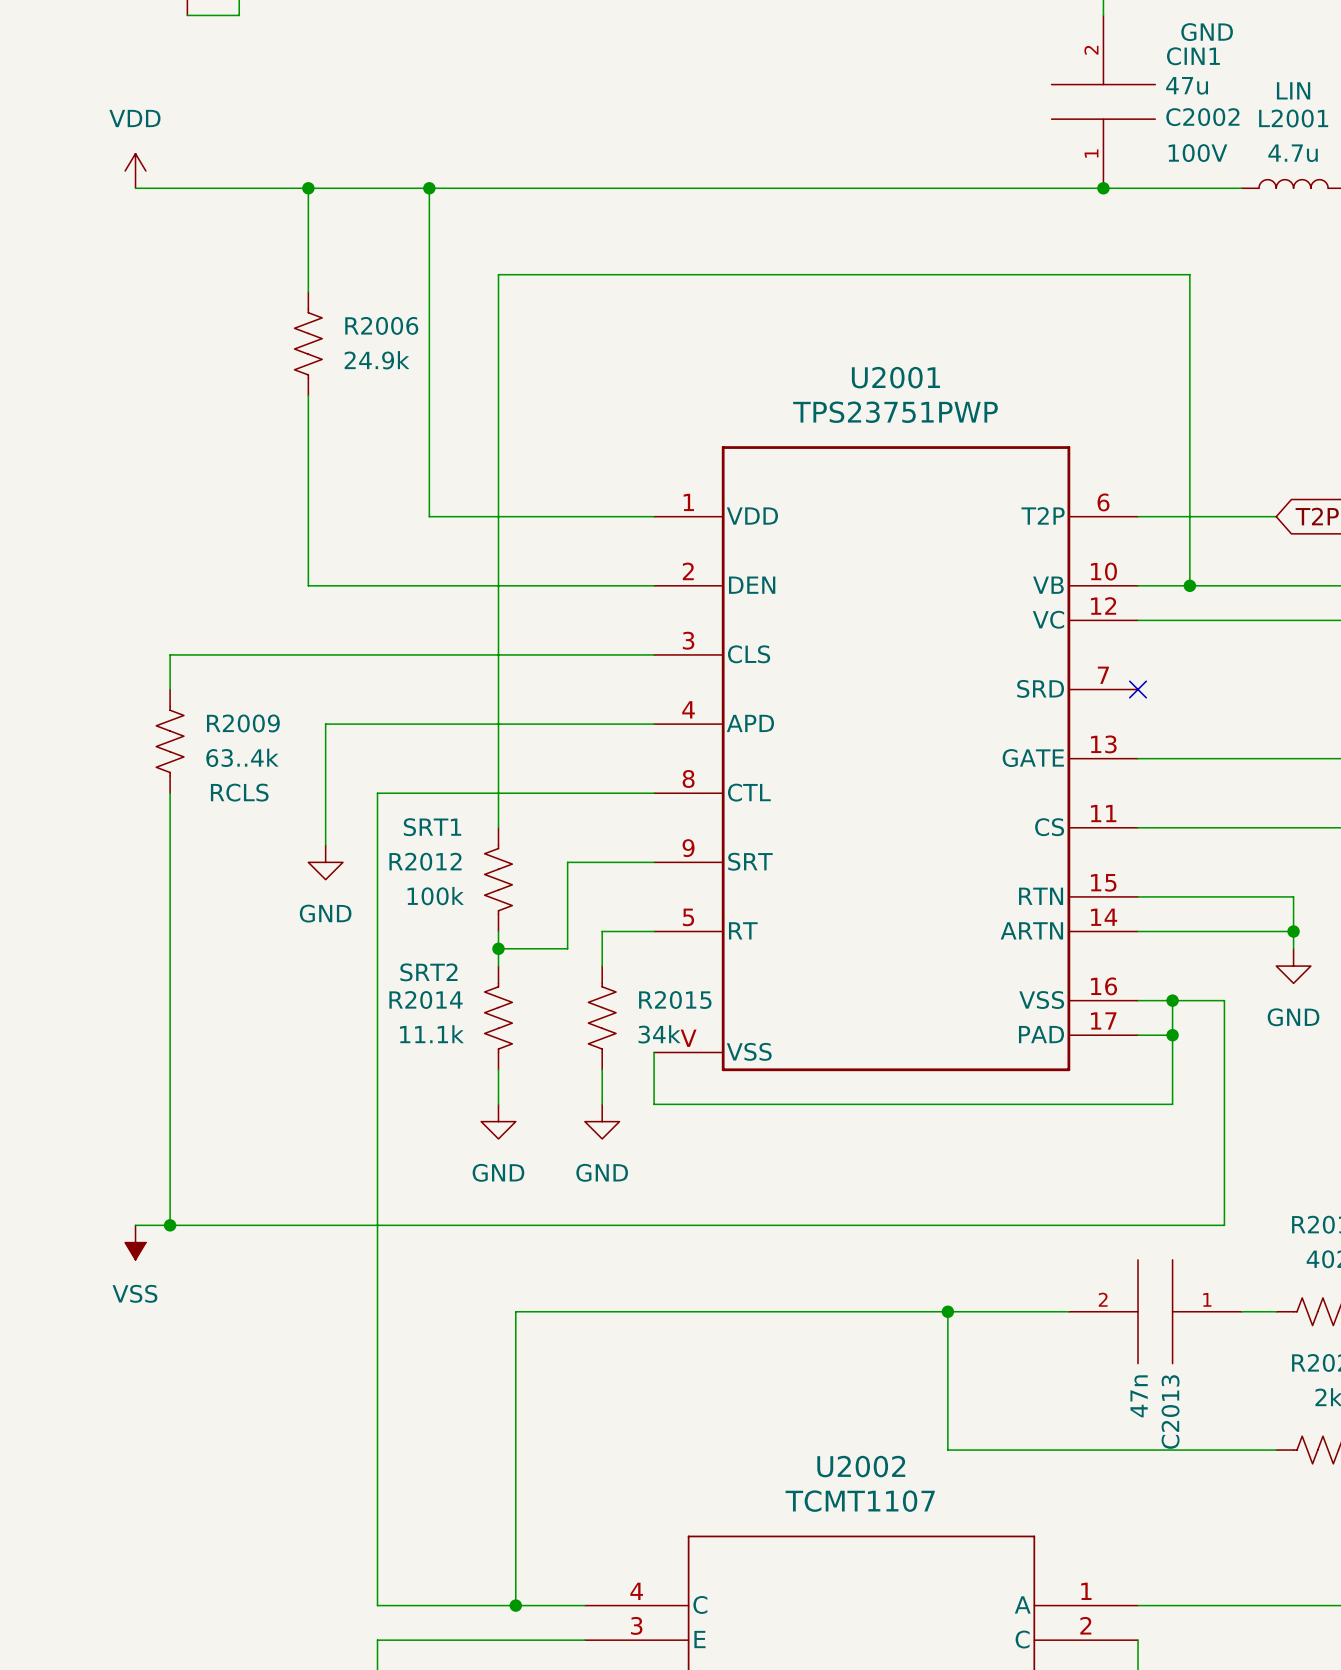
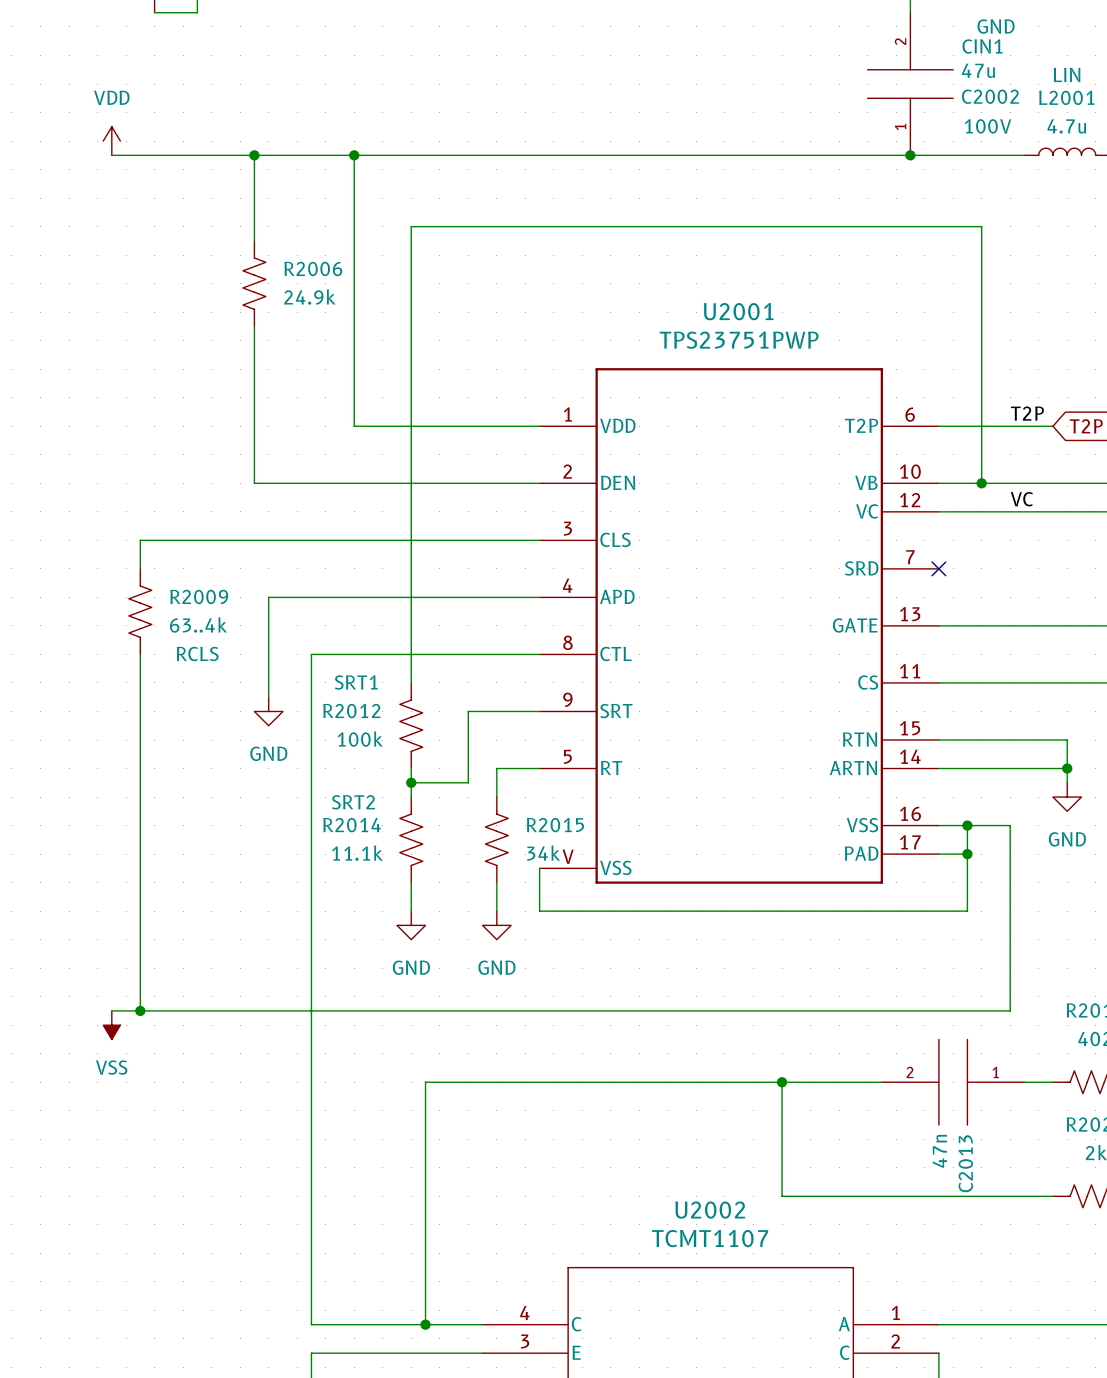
label: none -> T2P (1027, 413)
label: none -> VC (1021, 499)

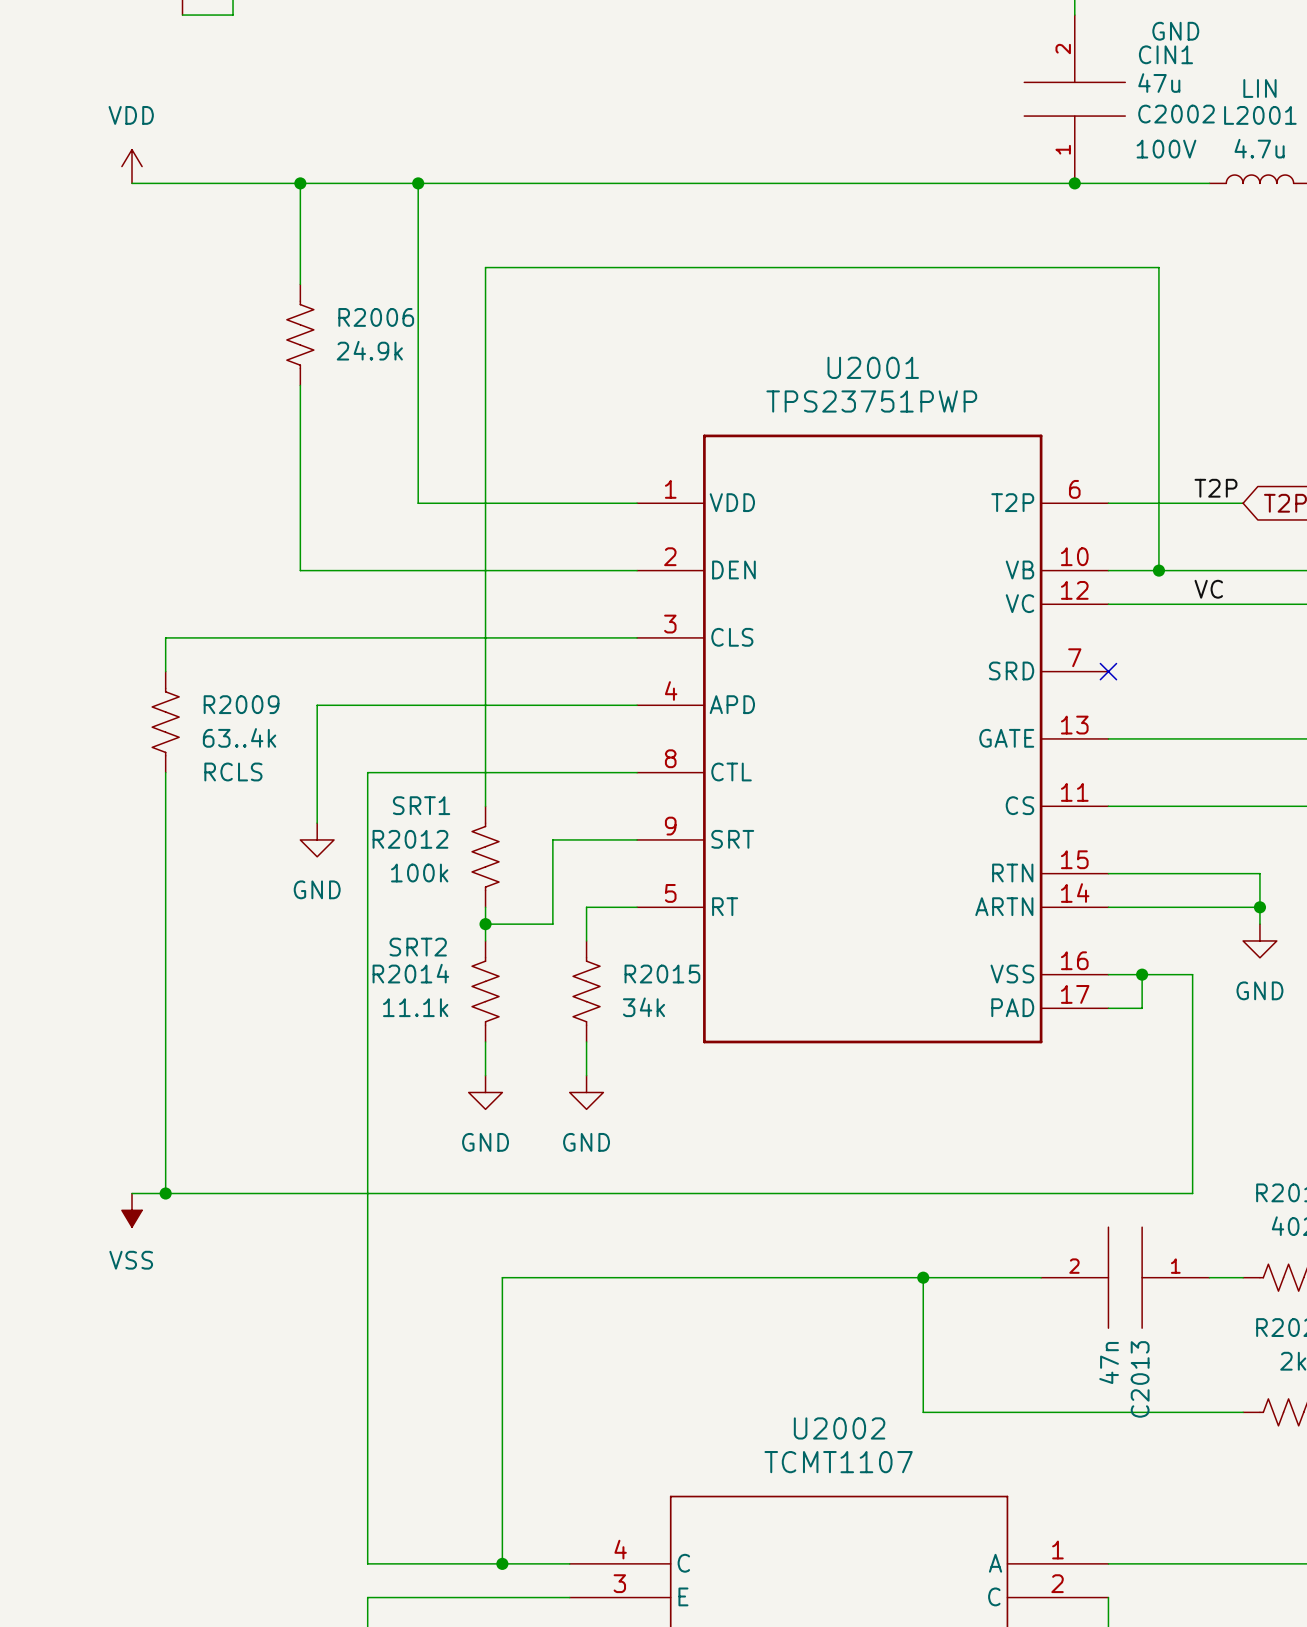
U2001 symbol: [539, 368, 939, 884] -> [637, 434, 1109, 1044]
wire: (967, 854) (967, 911) (539, 911) (539, 868) -> none
junction: (967, 854) -> none

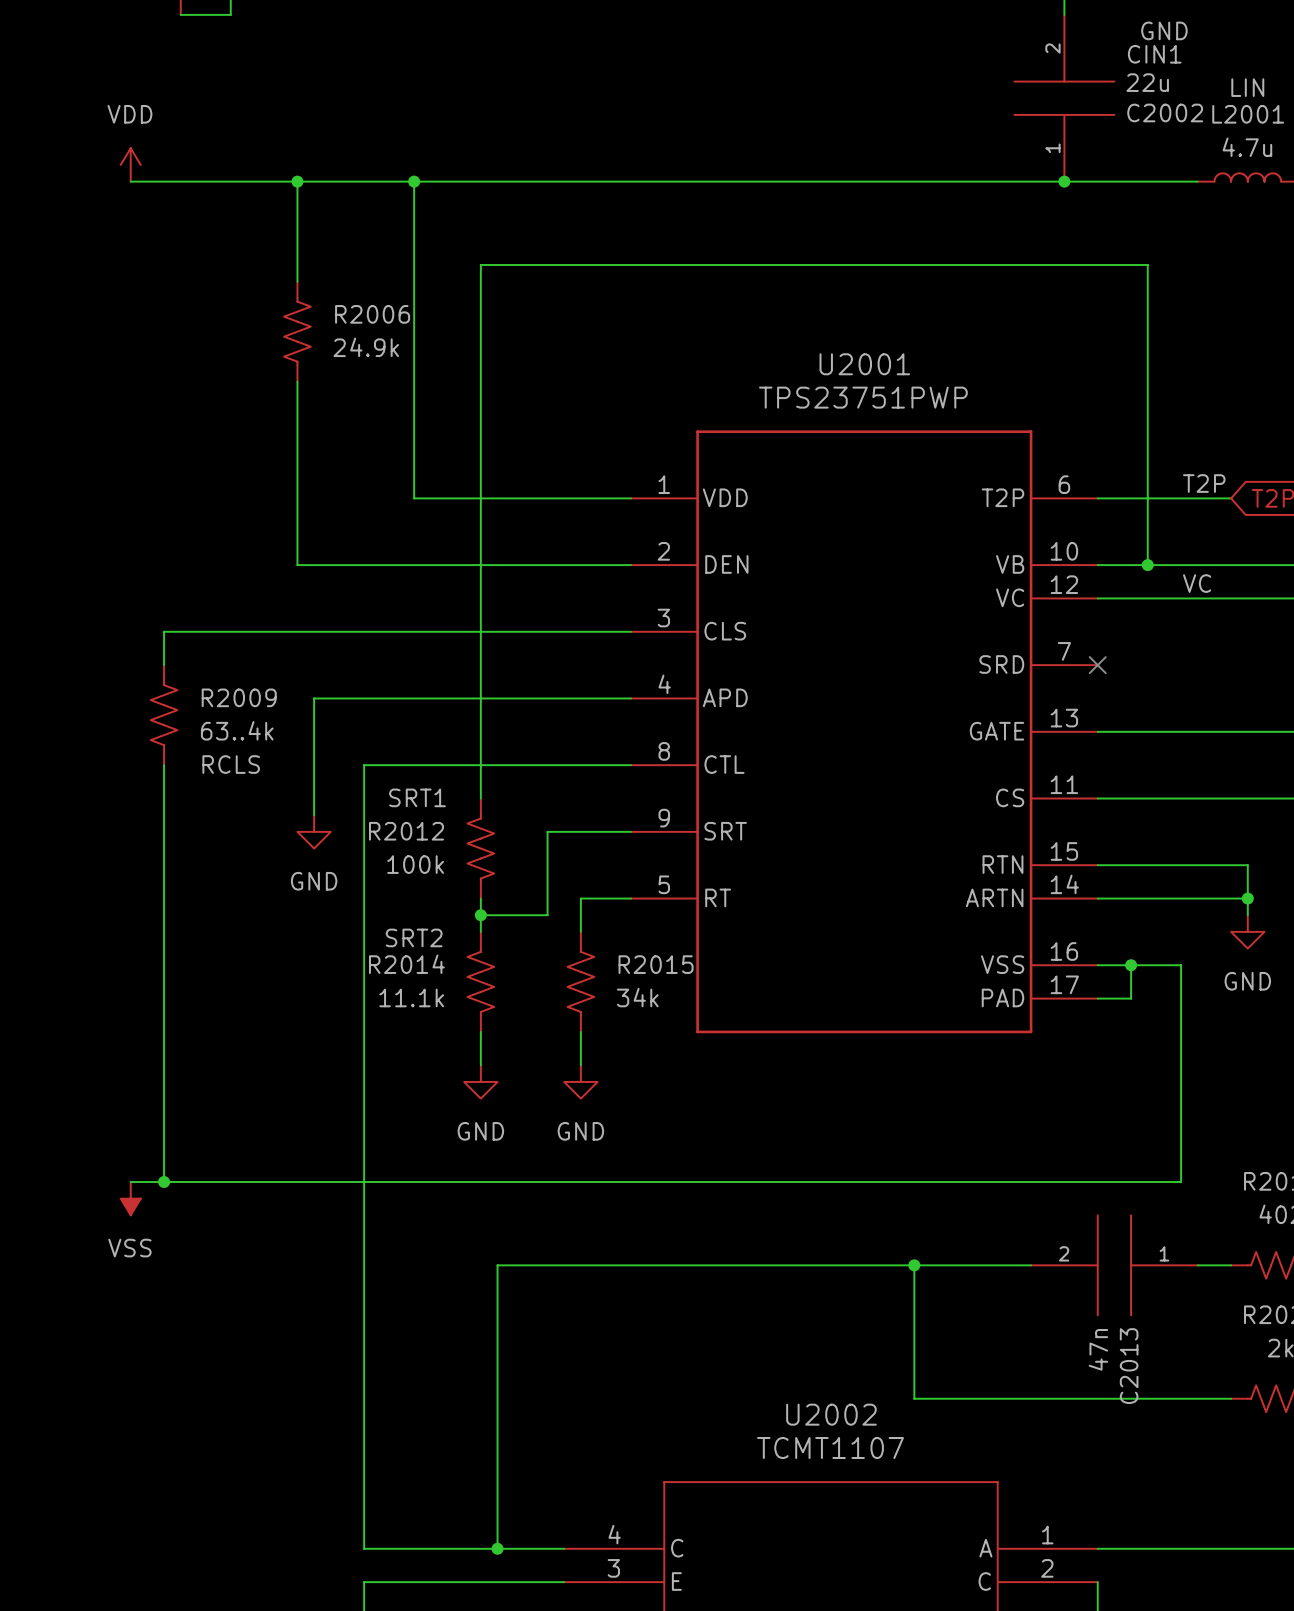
C2002 value: 47u (1159, 83) -> 22u (1147, 82)
C2002 text: 100V (1166, 149) -> none

